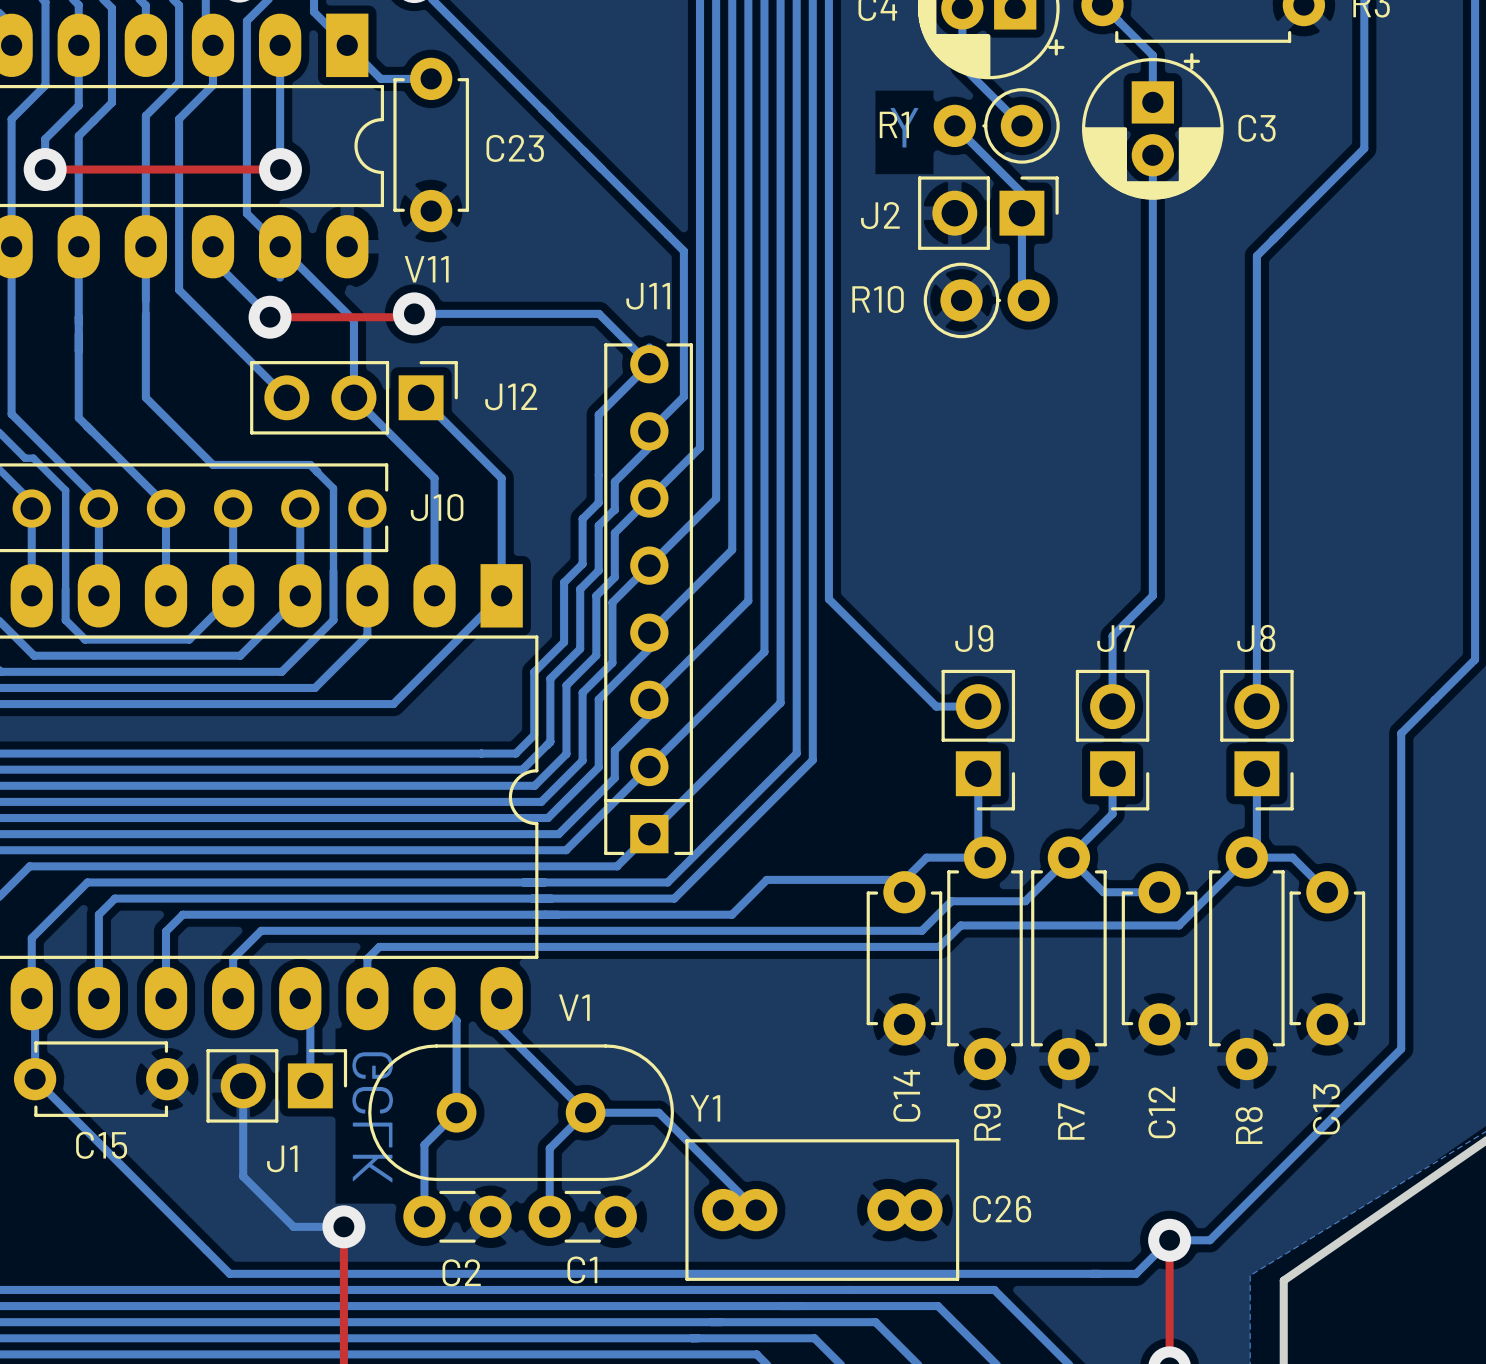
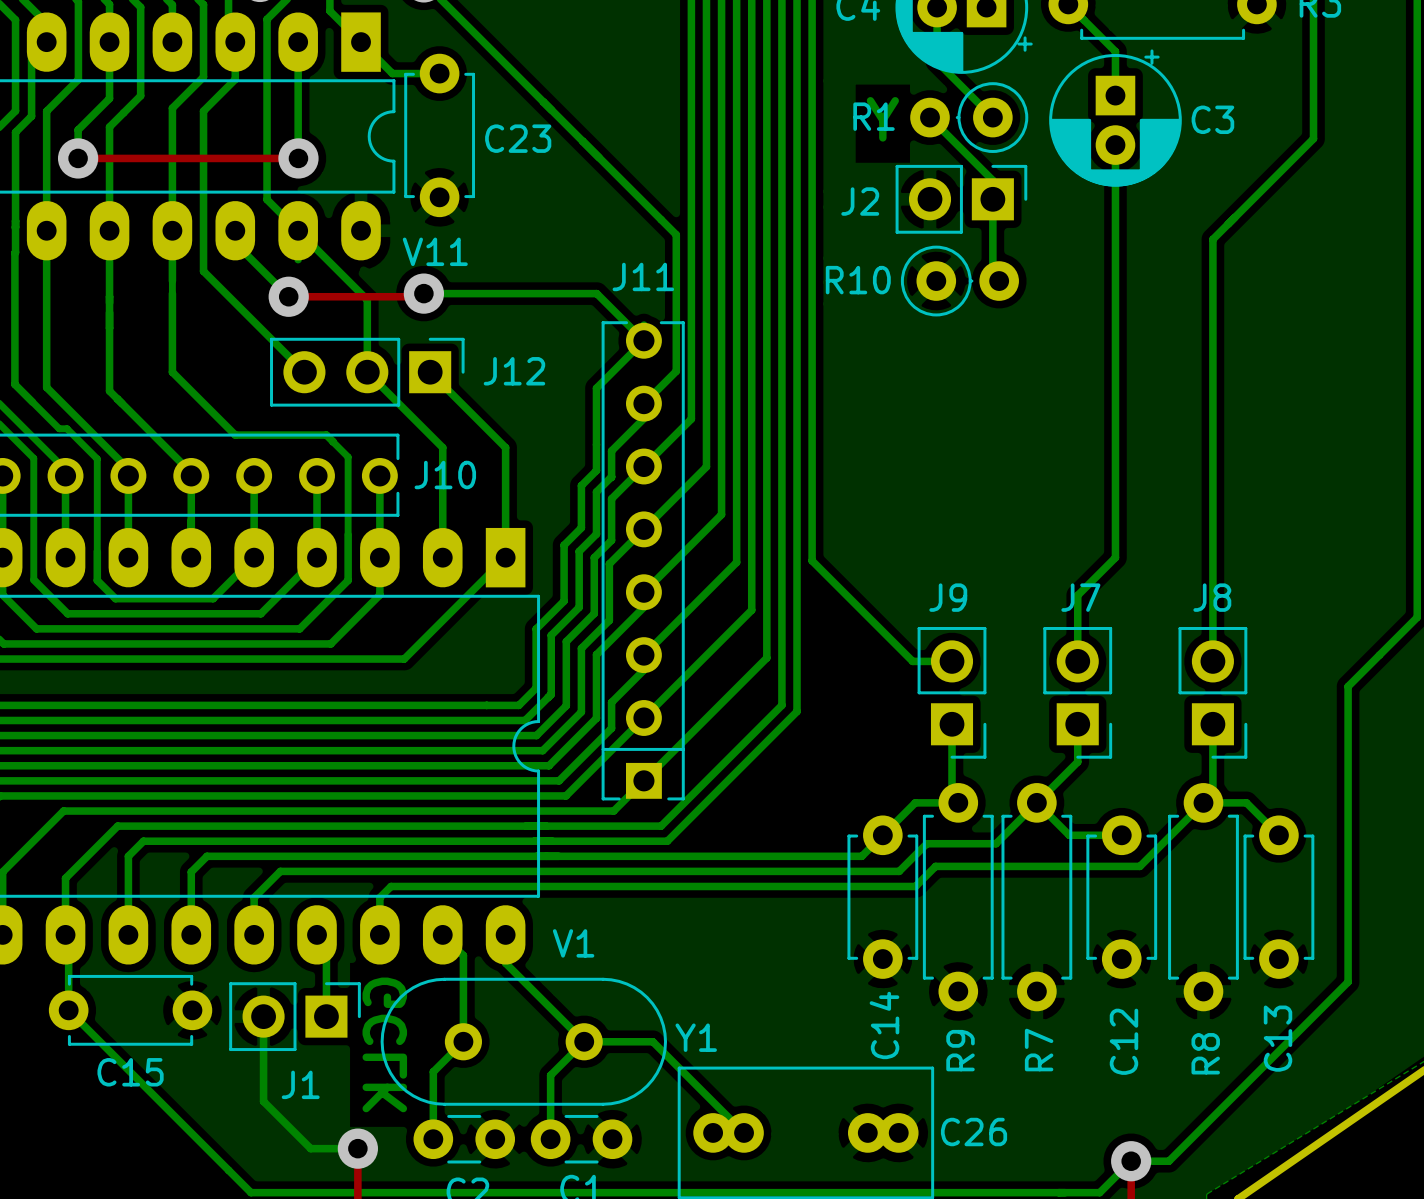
bottom track: (939, 857) (926, 857) (899, 884) -> none
bottom track: (904, 879) (766, 879) (732, 914) -> (915, 802) (861, 856) (721, 856)

